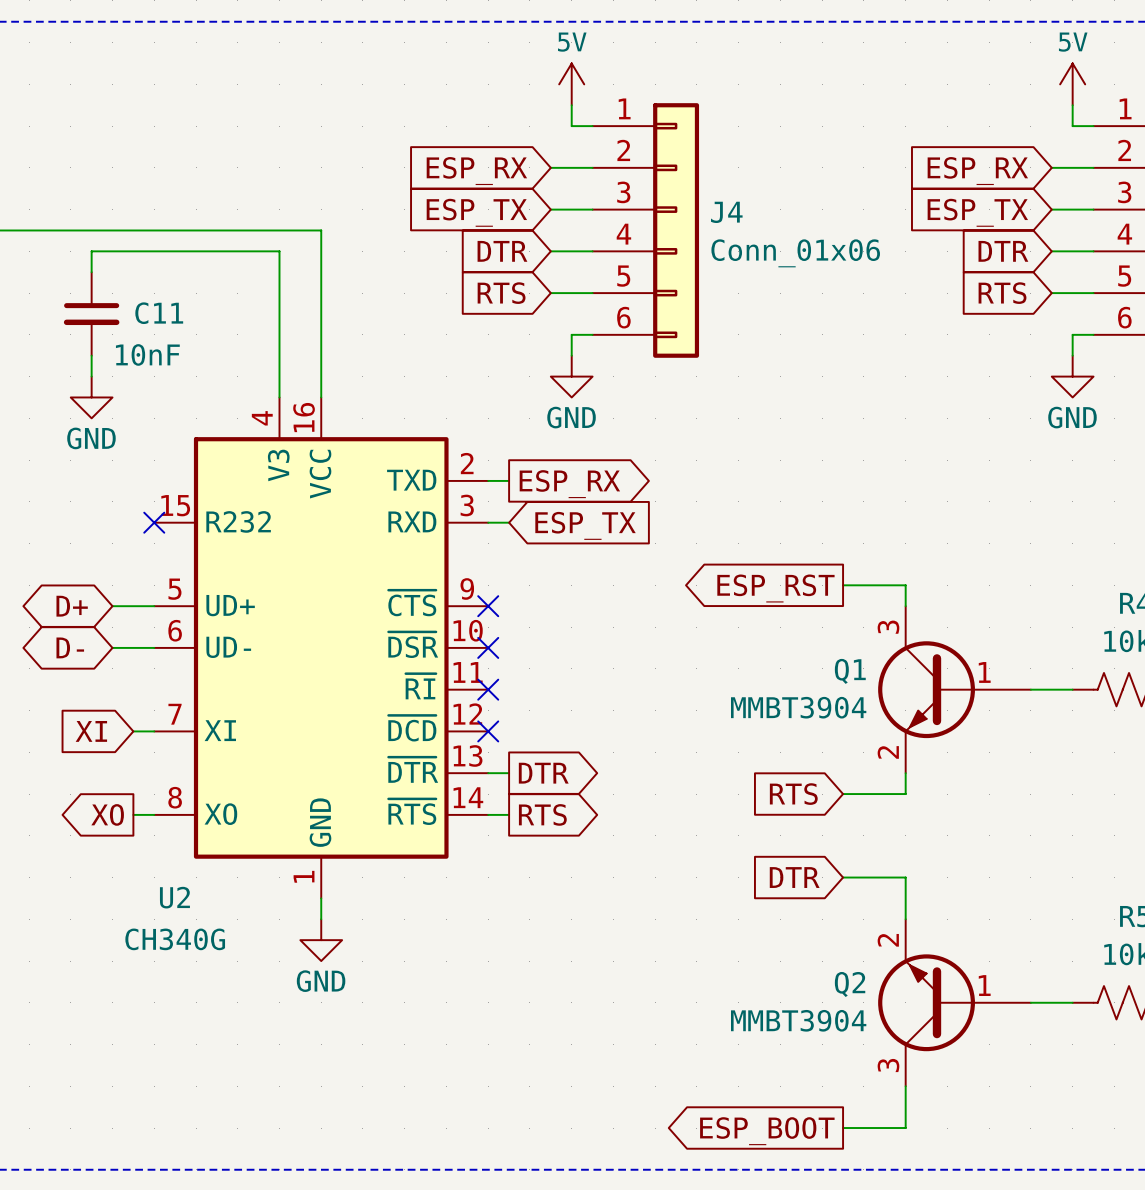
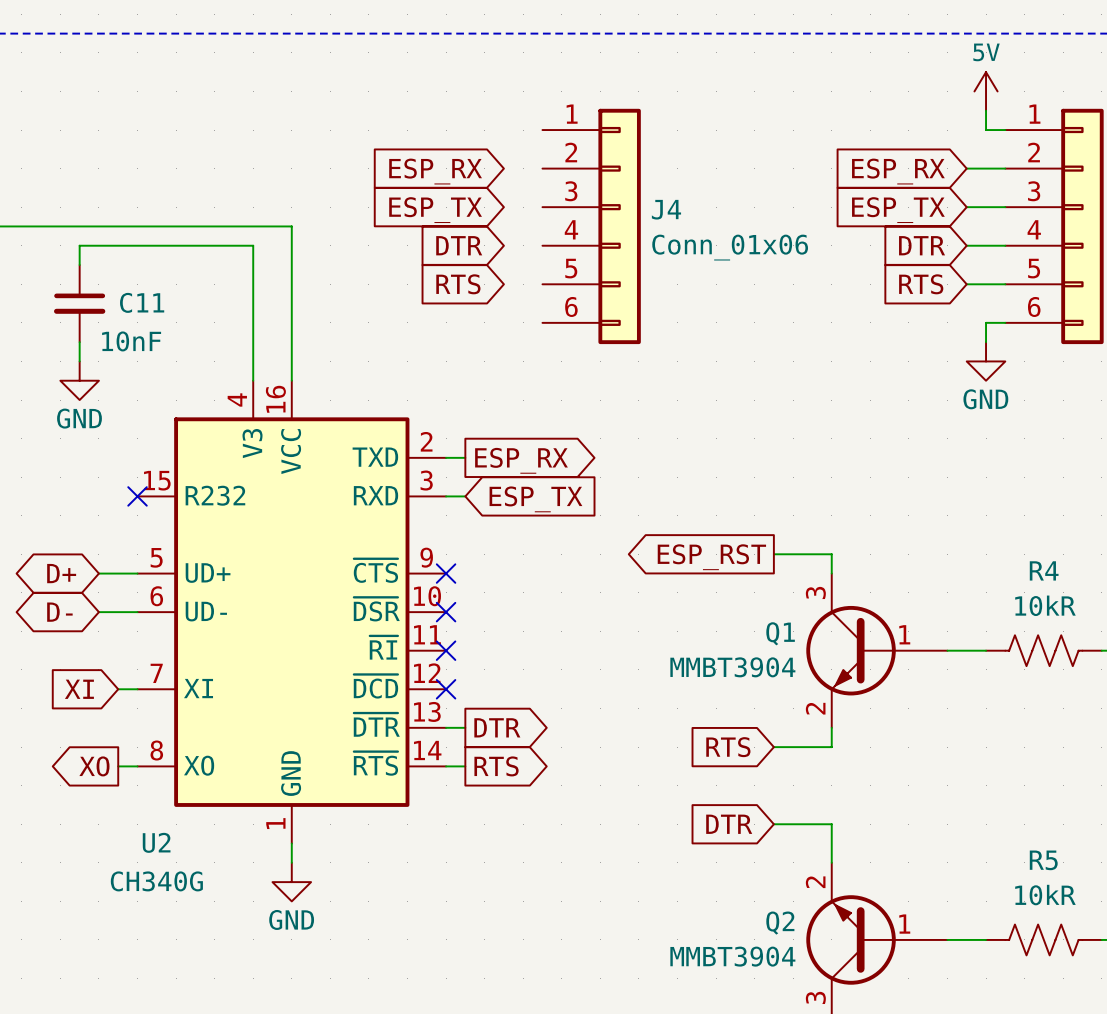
power symbol: 5V (571, 84) -> none
wire: (571, 105) (571, 126) (592, 126) -> none
wire: (550, 167) (592, 167) -> none
wire: (550, 209) (592, 209) -> none
wire: (550, 251) (592, 251) -> none
wire: (550, 293) (592, 293) -> none
wire: (592, 334) (571, 334) (571, 355) -> none
power symbol: GND (571, 376) -> none

